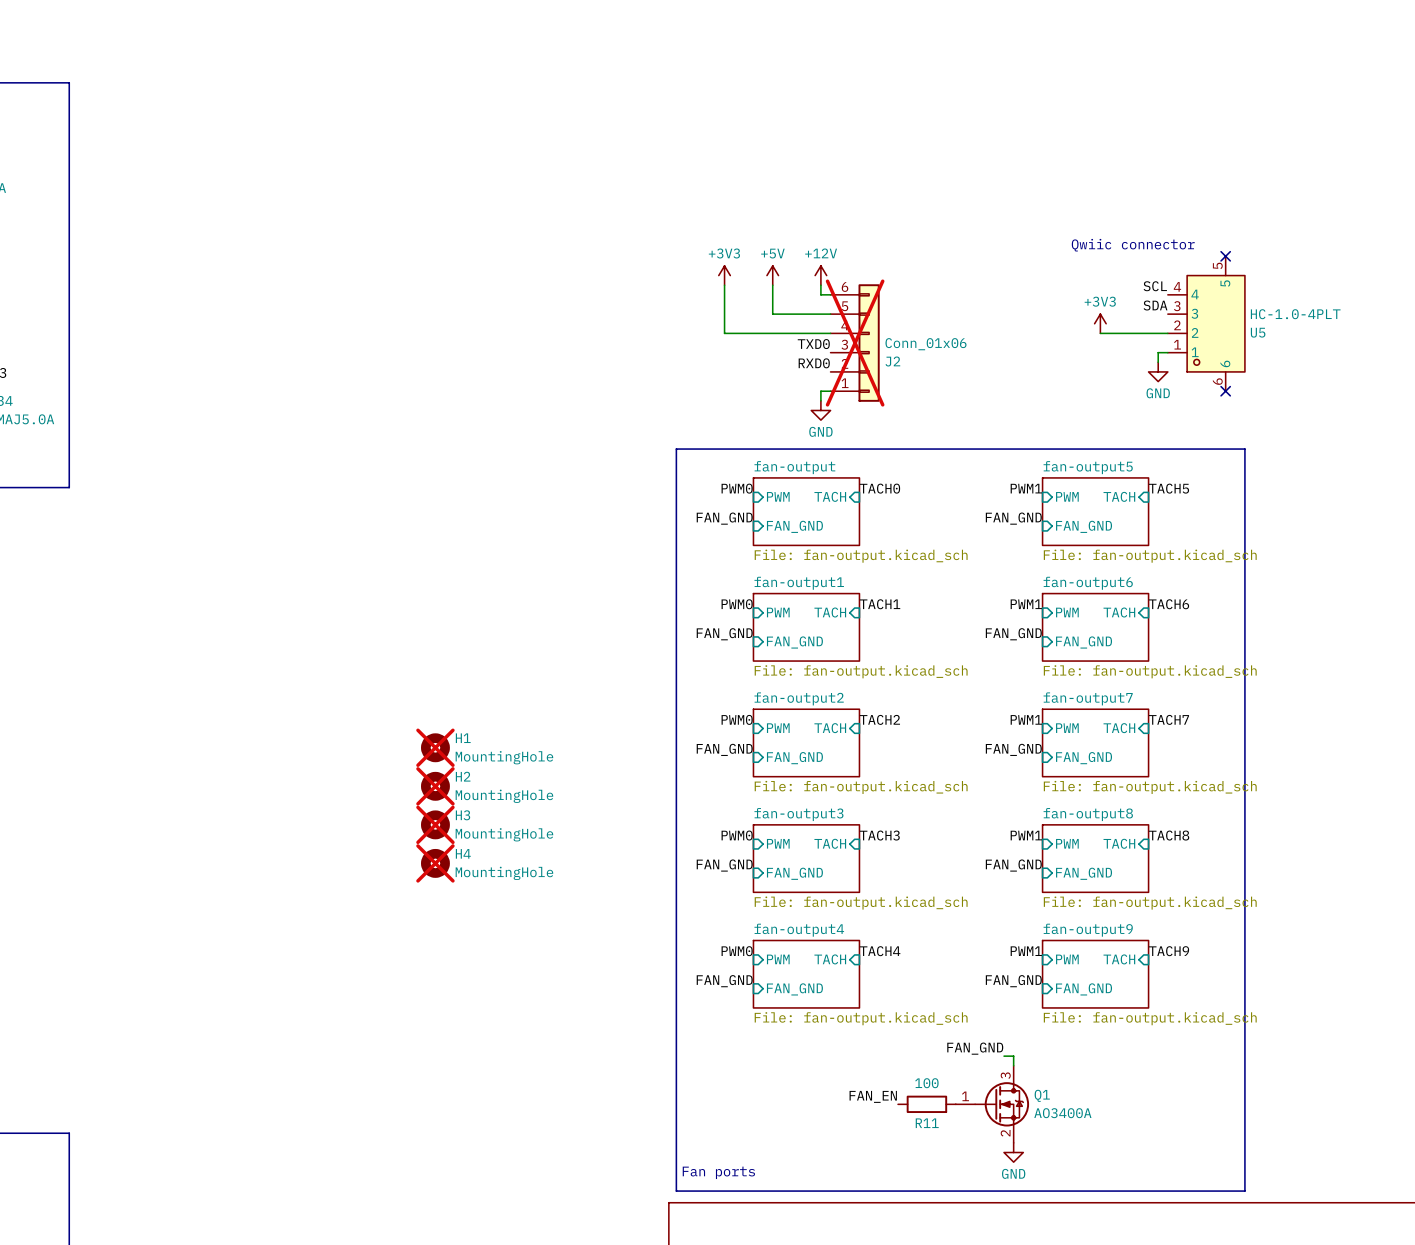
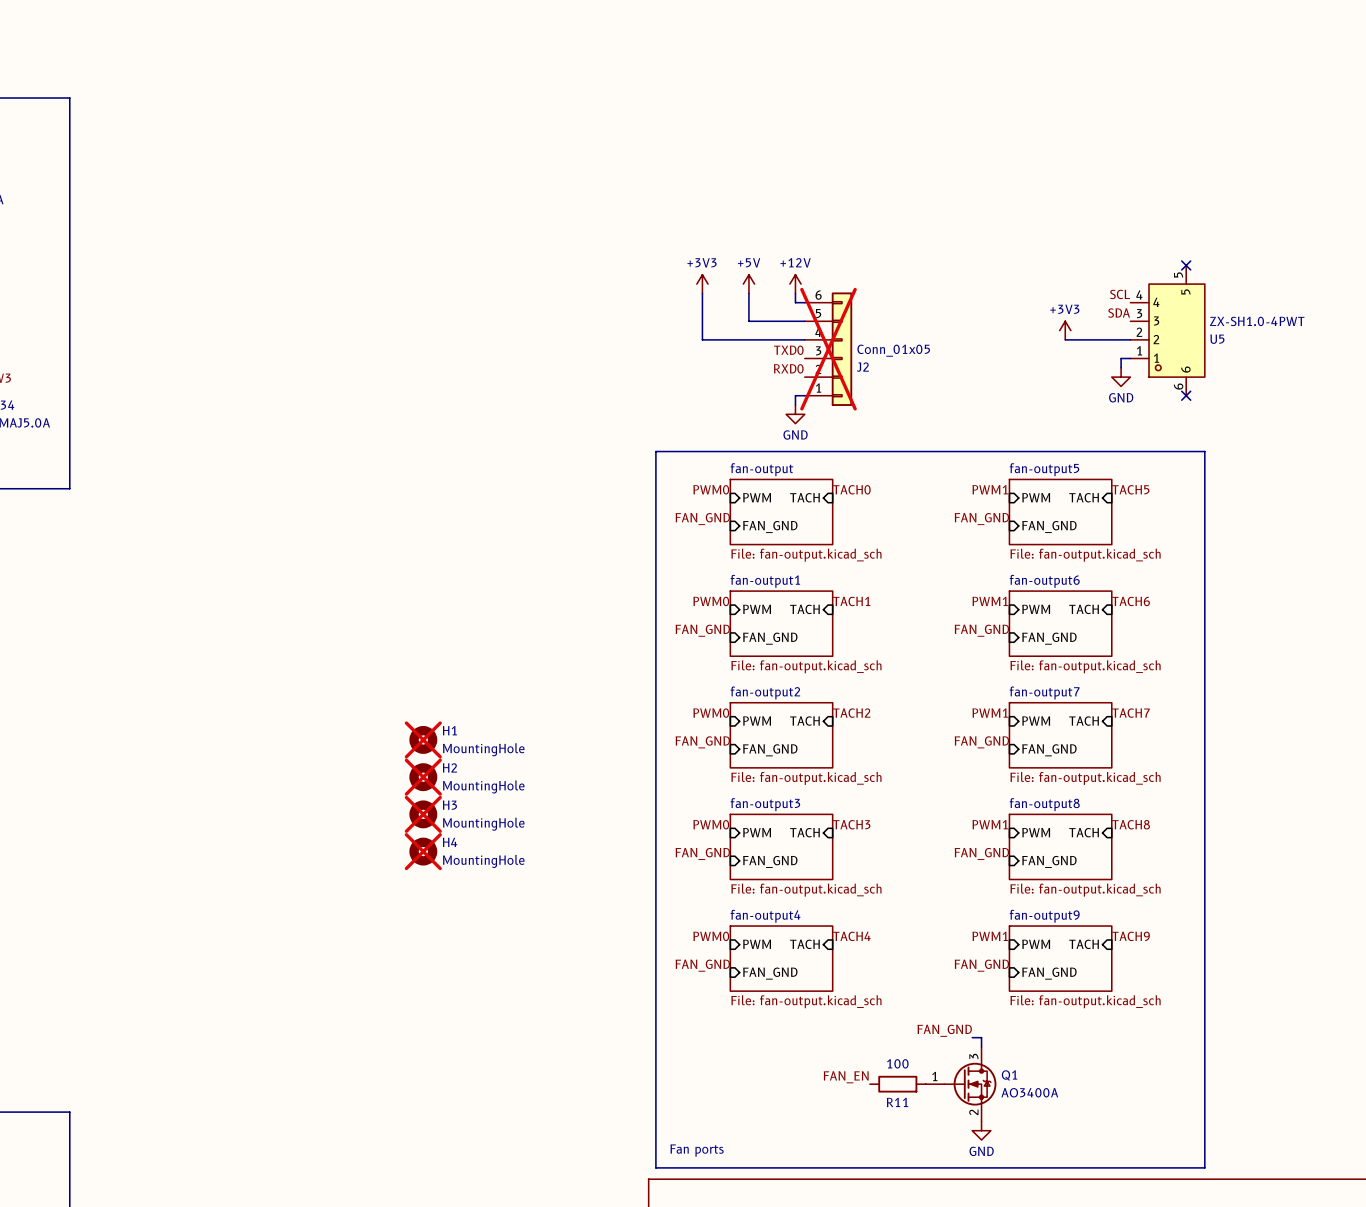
text: Qwiic connector (1133, 245) -> none
U5 value: HC-1.0-4PLT (1295, 314) -> ZX-SH1.0-4PWT (1257, 321)
J2 value: Conn_01x06 (925, 344) -> Conn_01x05 (893, 350)

